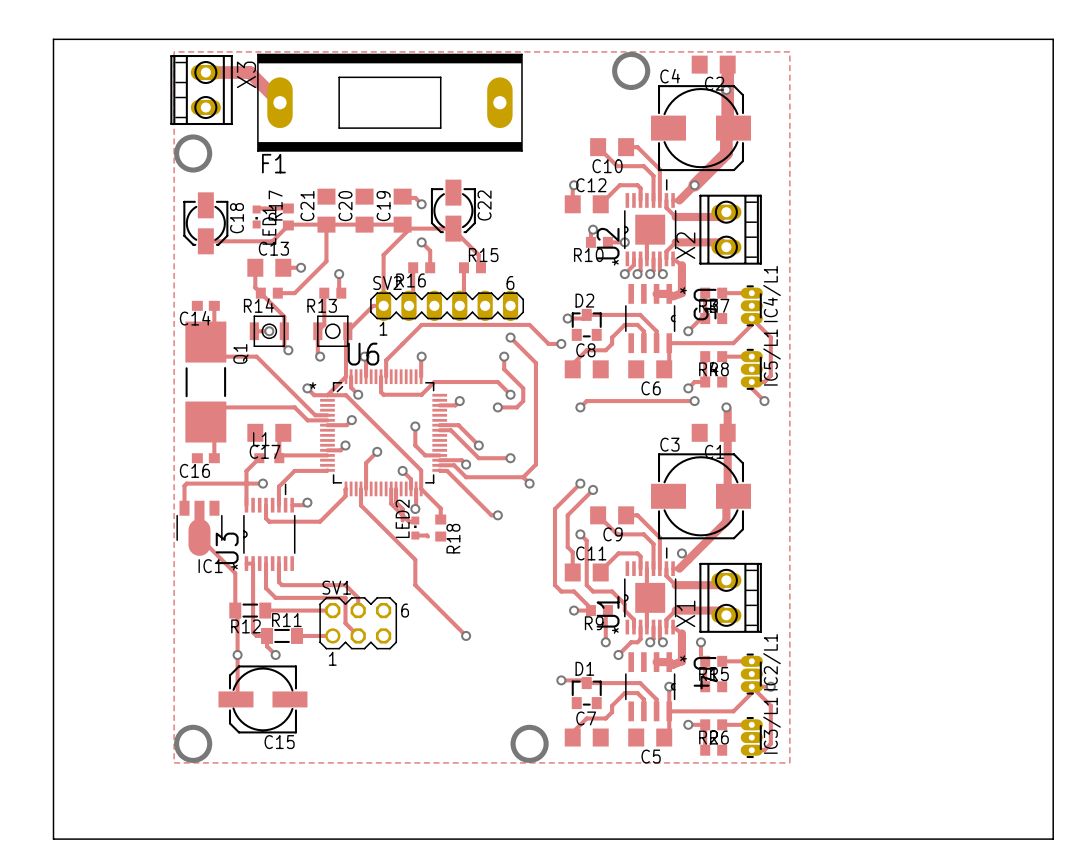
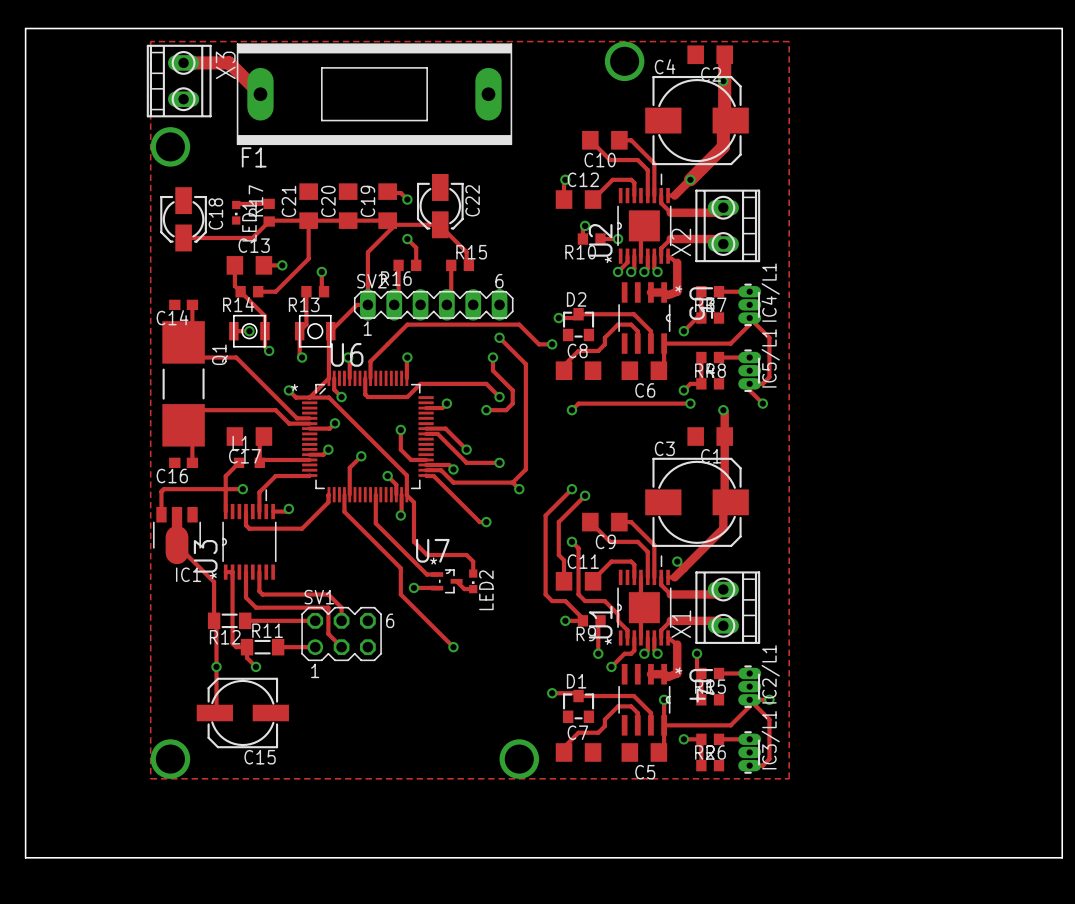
track: (396, 488) (396, 502) (402, 508) (402, 520) -> none
track: (421, 488) (440, 508) (440, 519) -> (406, 494) (413, 502) (413, 541) (427, 555) (466, 555) (473, 561) (473, 573)
track: (391, 503) (408, 521) (415, 520) -> (375, 510) (375, 523) (426, 574) (437, 574)
LED2 rotation: 0° (415, 528) -> 180° (473, 581)
LED2 position: (415, 528) -> (473, 581)
R18: (440, 528) -> none
track: (415, 535) (428, 536) -> none
U7: none -> (446, 581)
track: none -> (456, 581) (464, 589) (473, 589)
track: none -> (413, 587) (437, 588)
via: none -> (413, 587)

